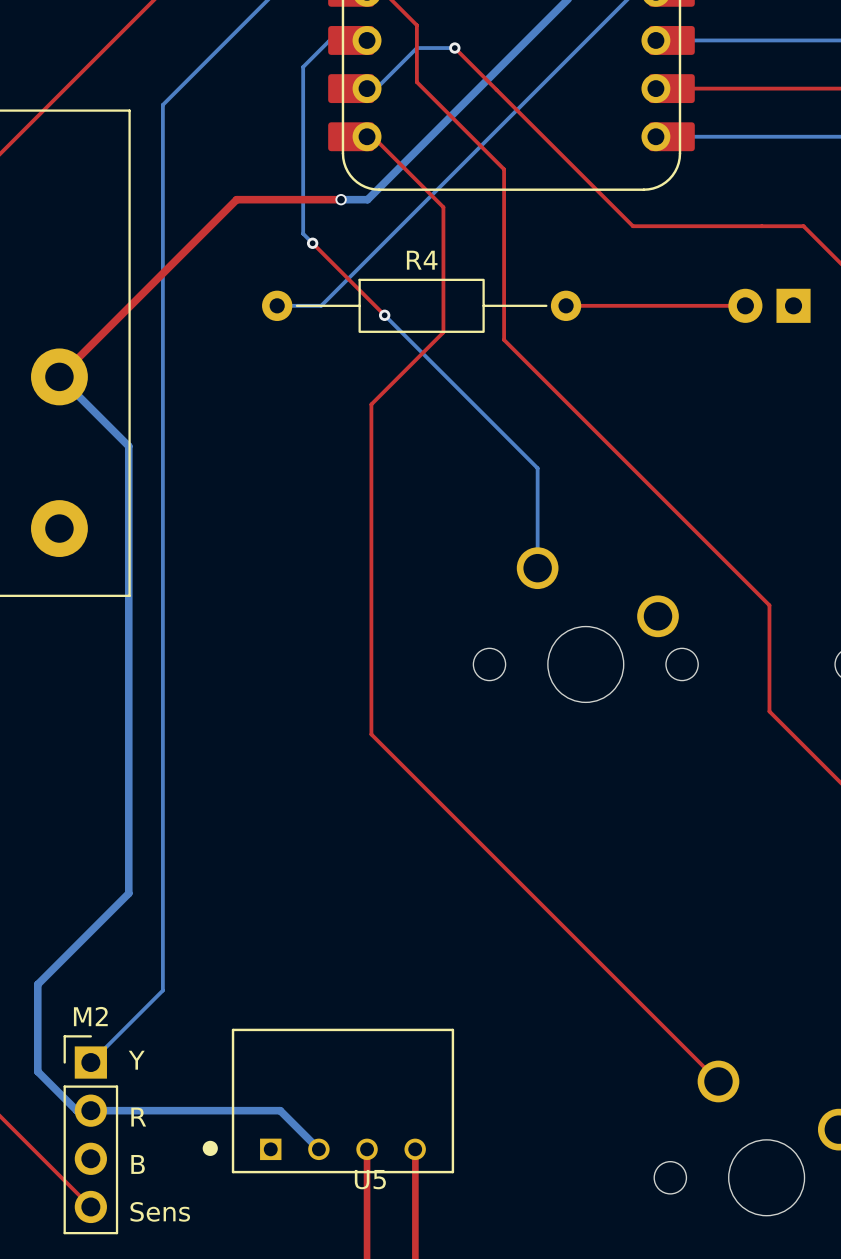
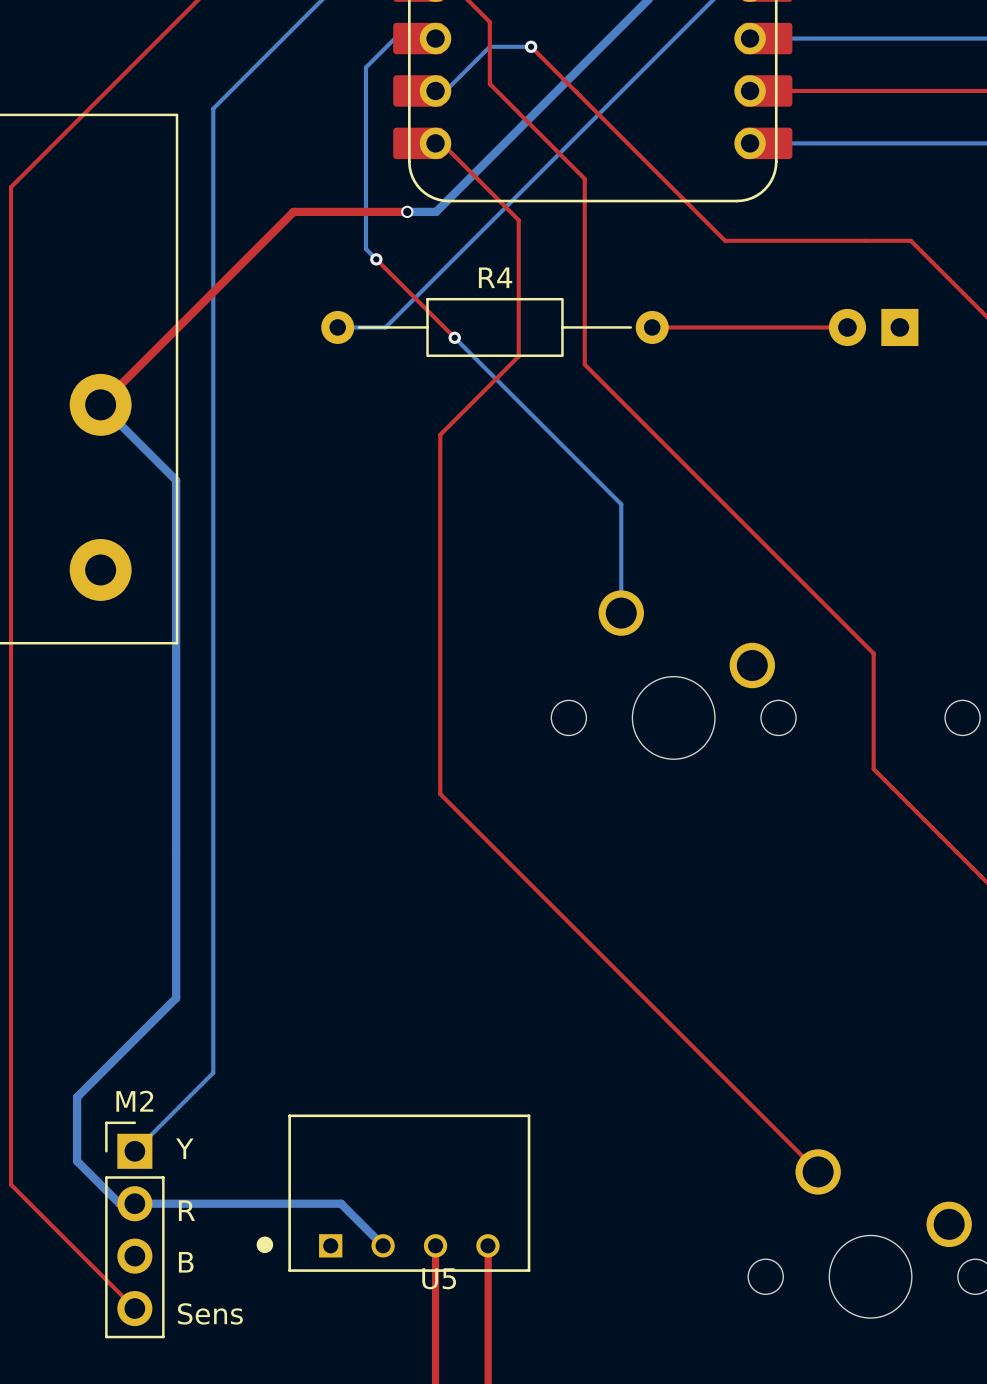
bottom track: (128, 893) (37, 984) (37, 1012) -> (176, 967) (176, 998) (77, 1097)

